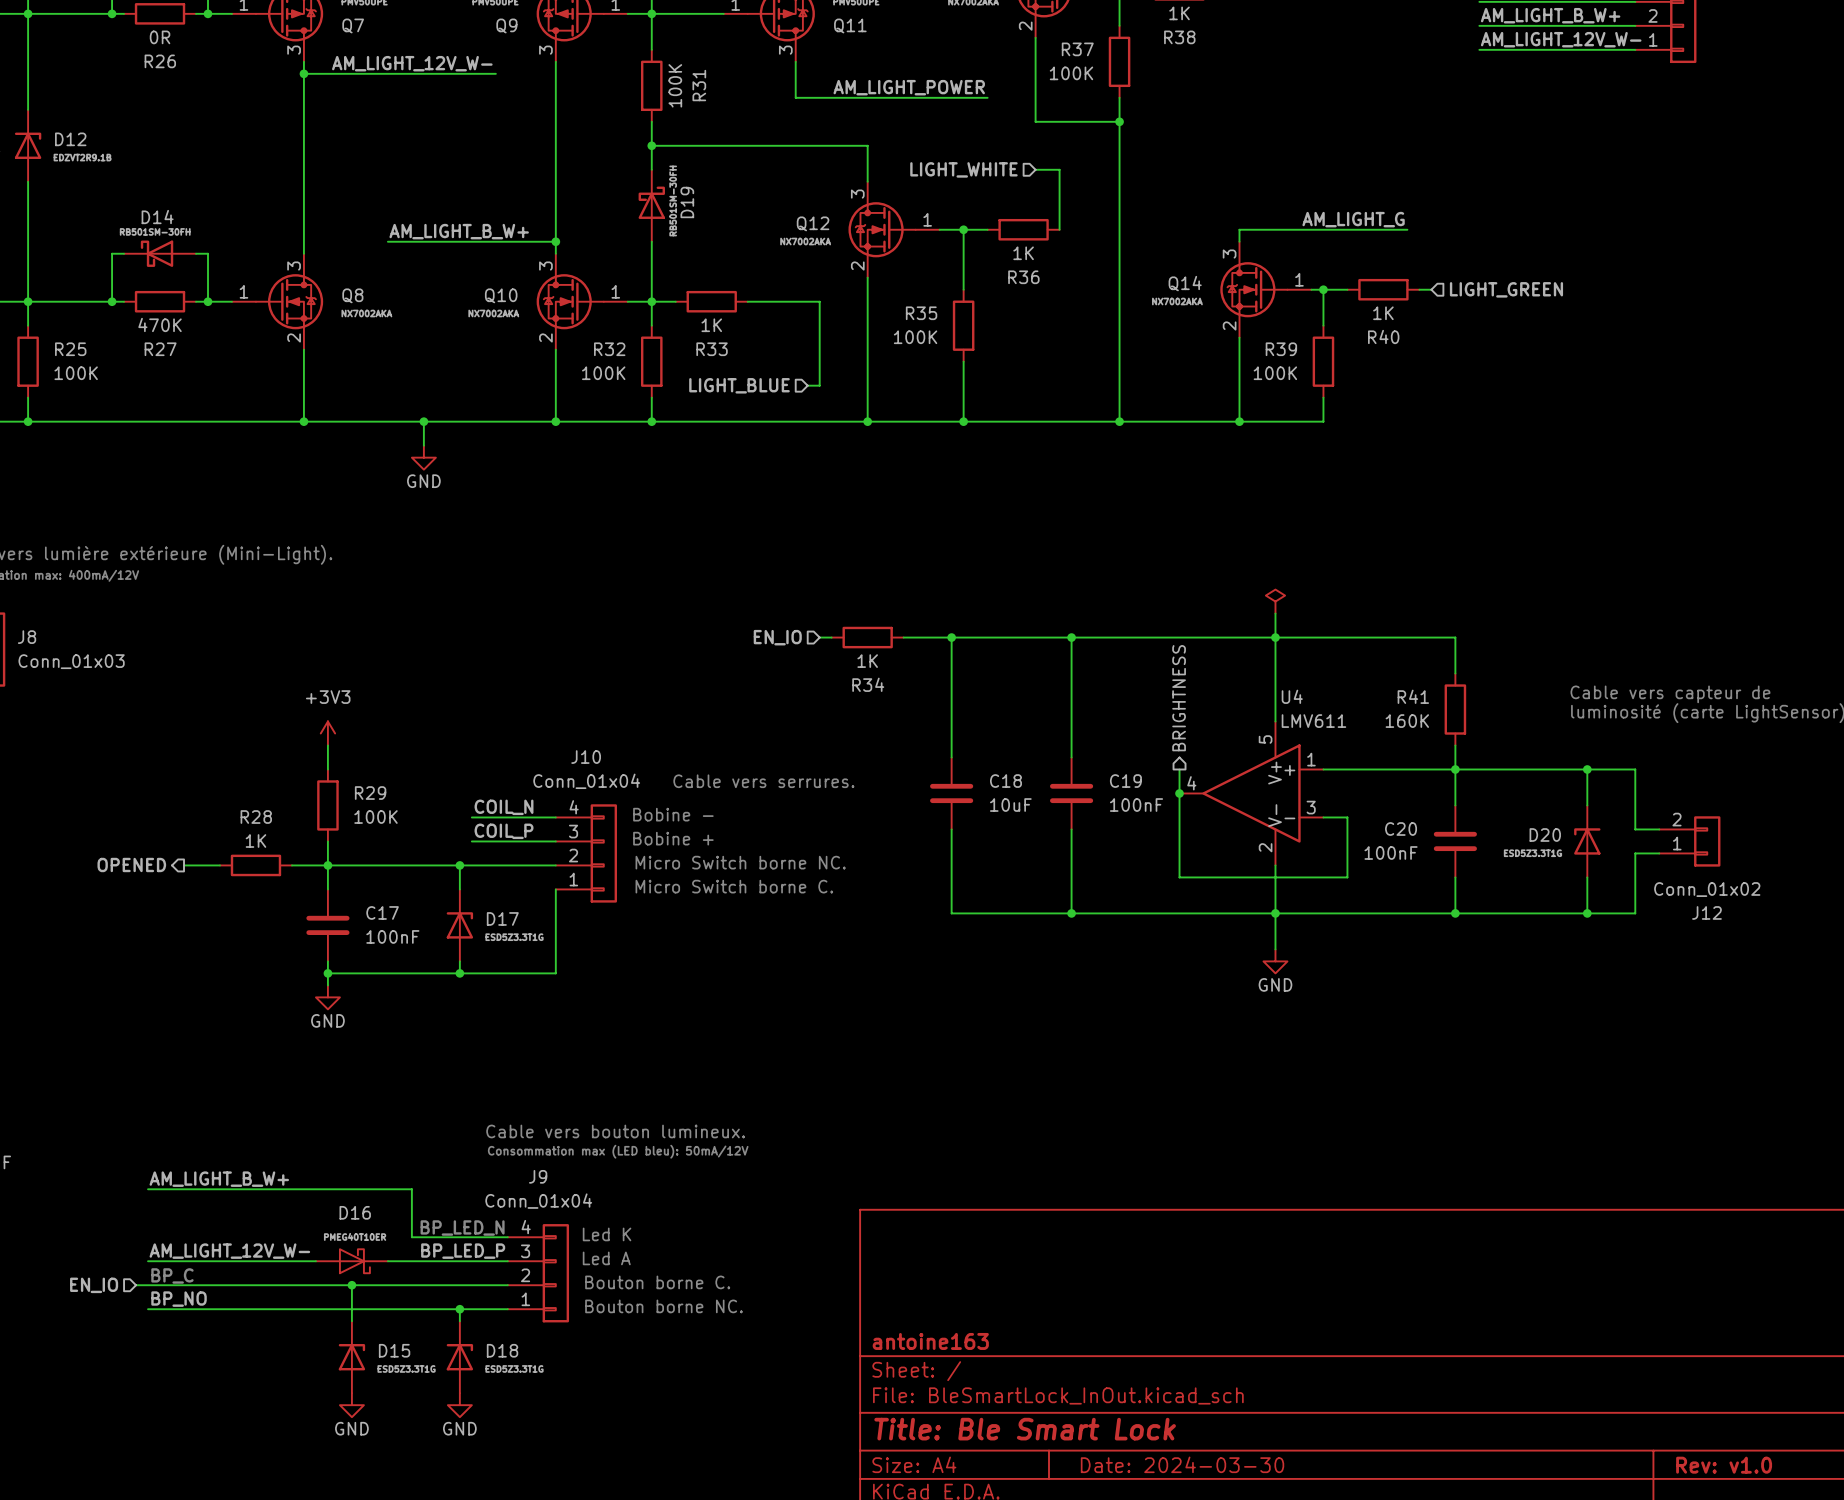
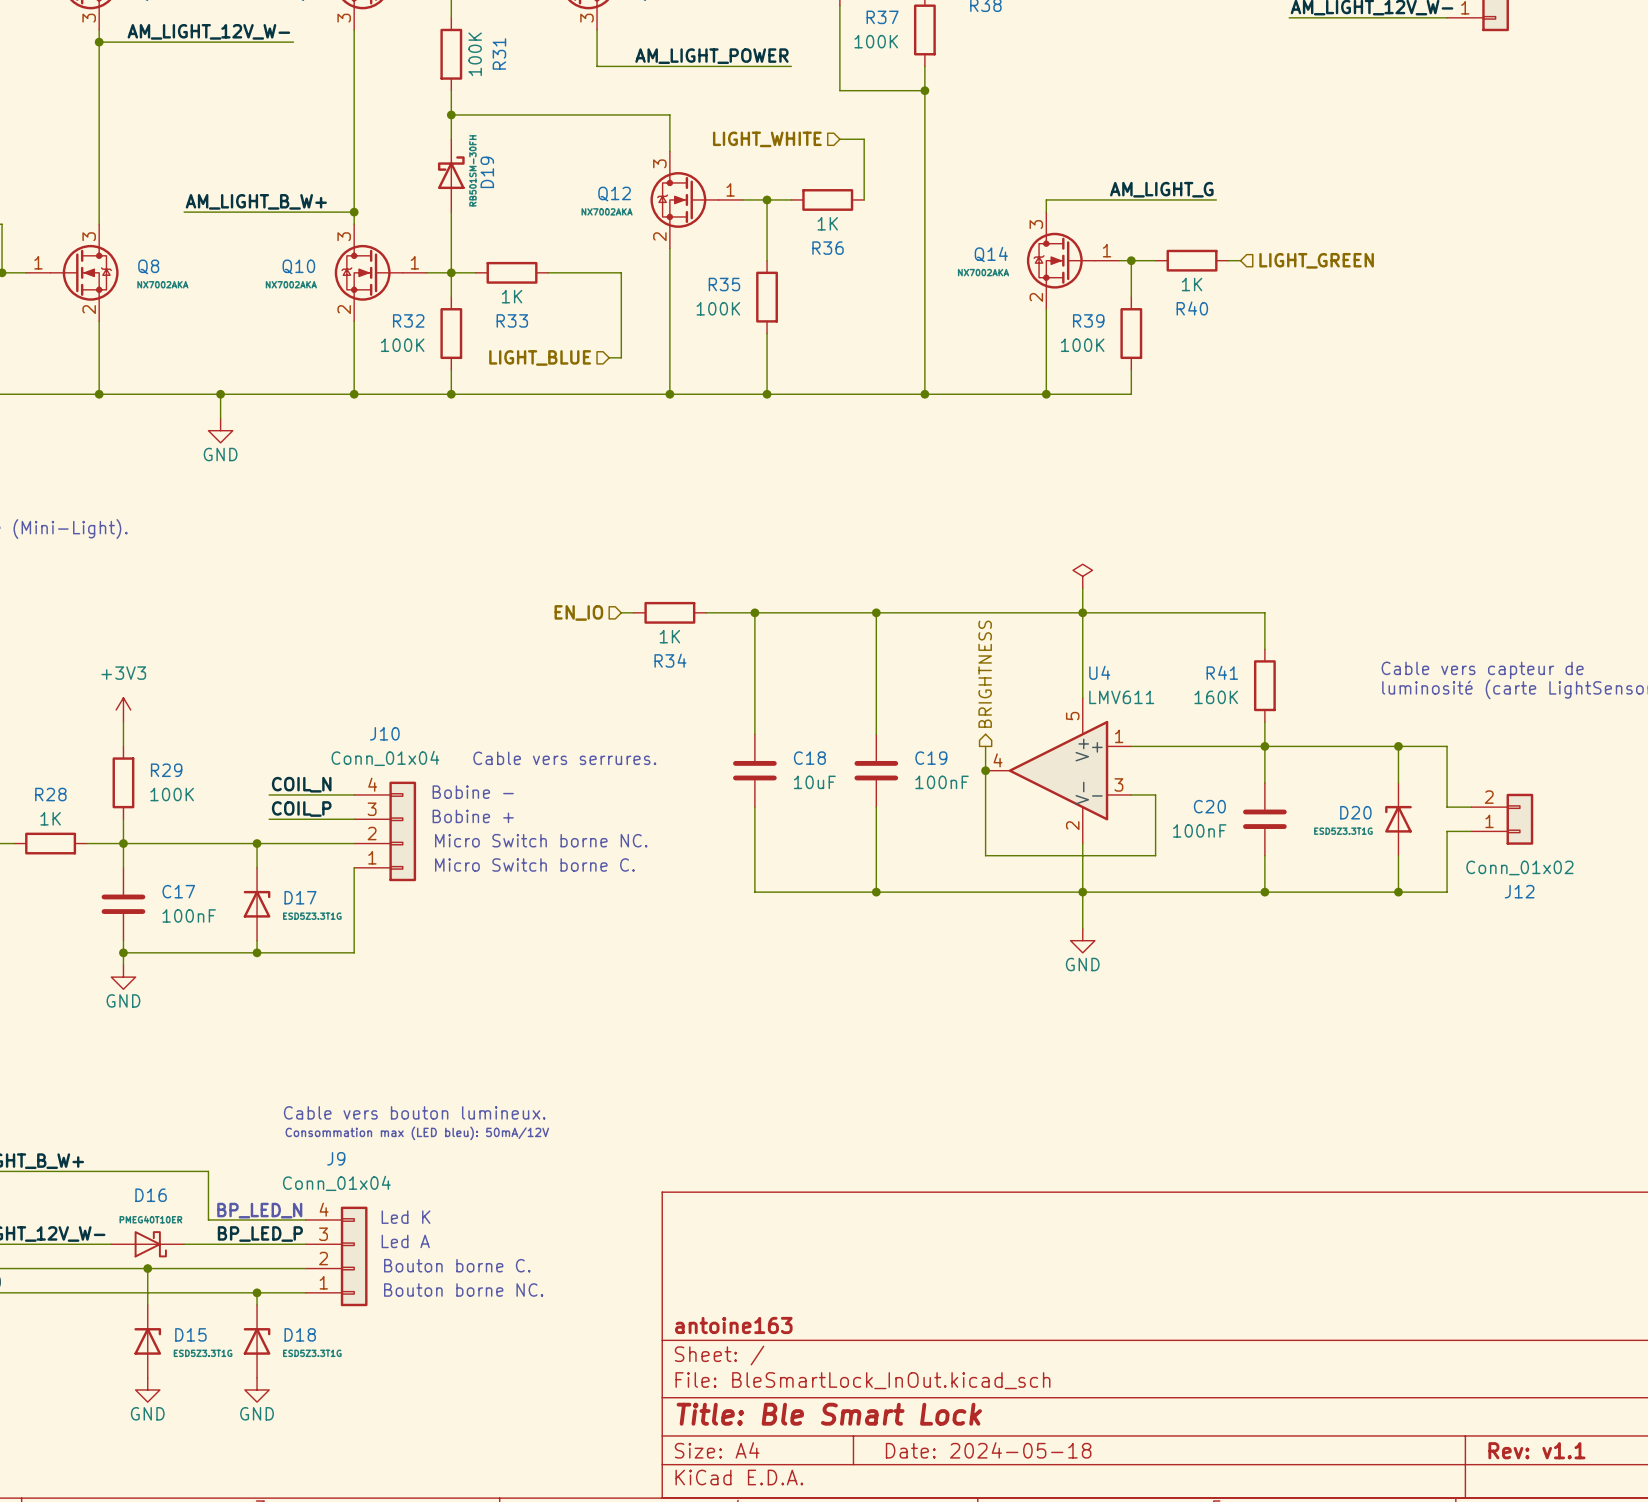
title block: Date: 2024-03-30 (1182, 1464) -> Date: 2024-05-18 (988, 1450)
title block: Rev: v1.0 (1724, 1465) -> Rev: v1.1 (1536, 1450)

